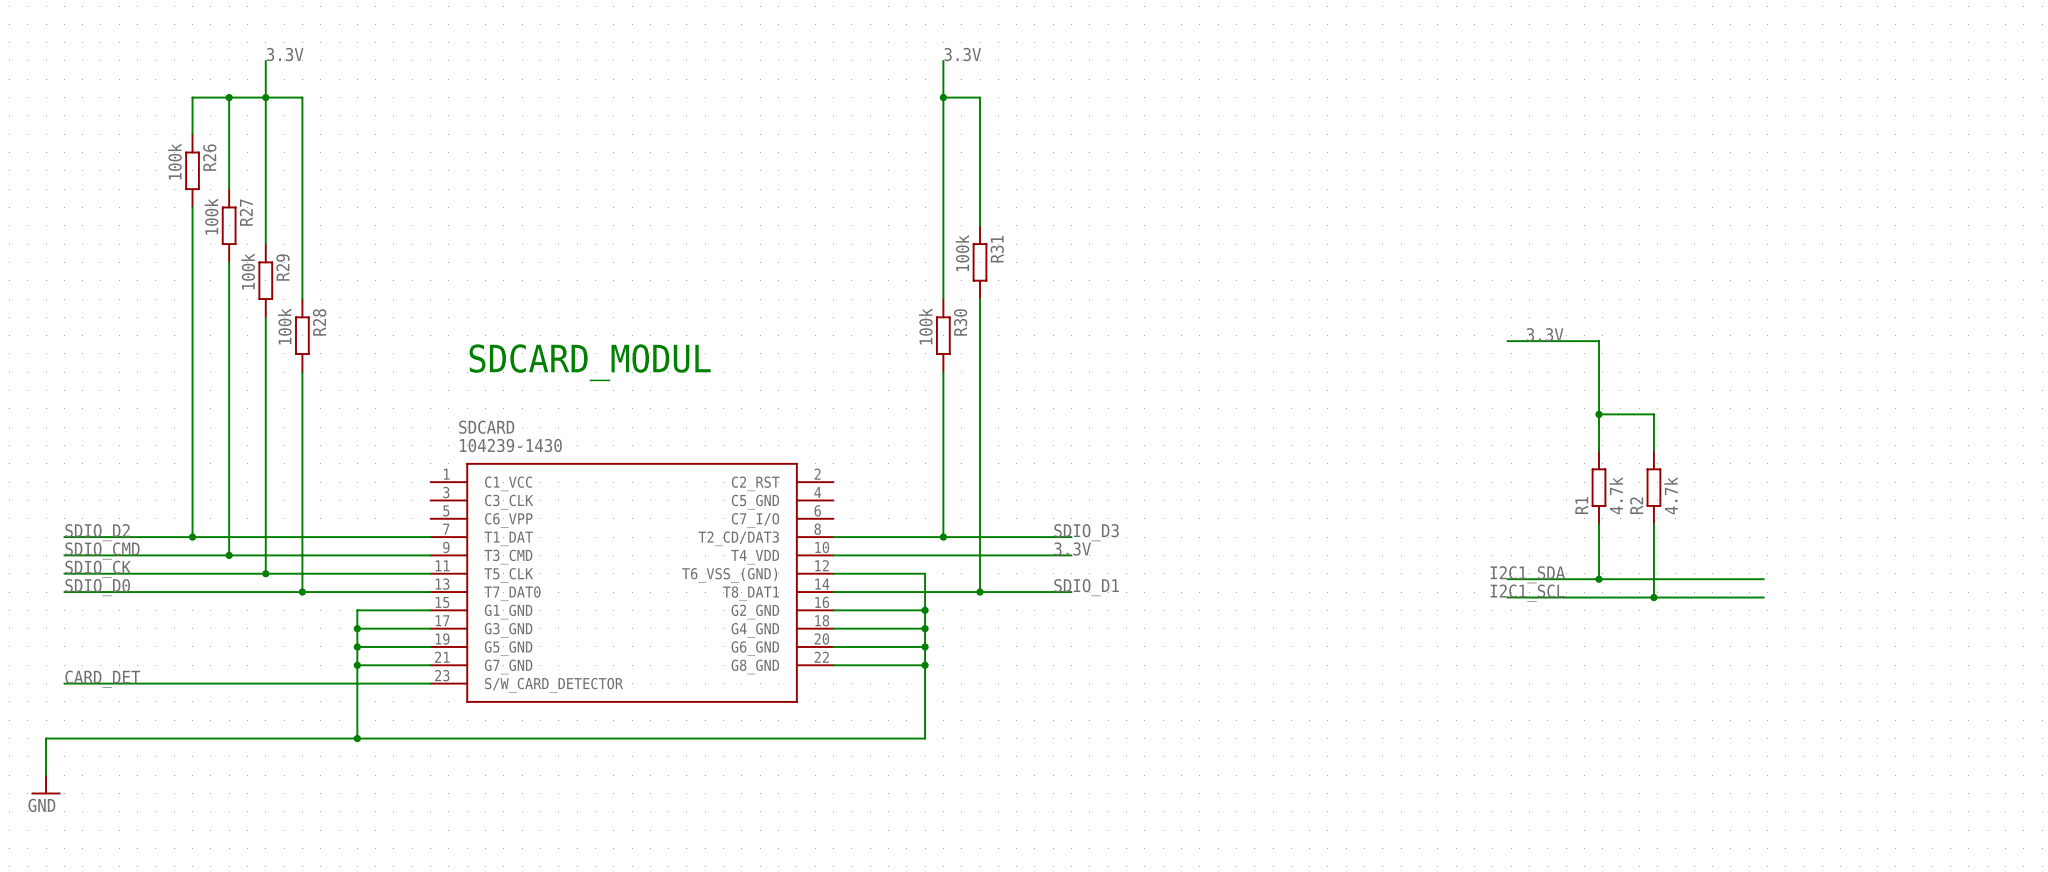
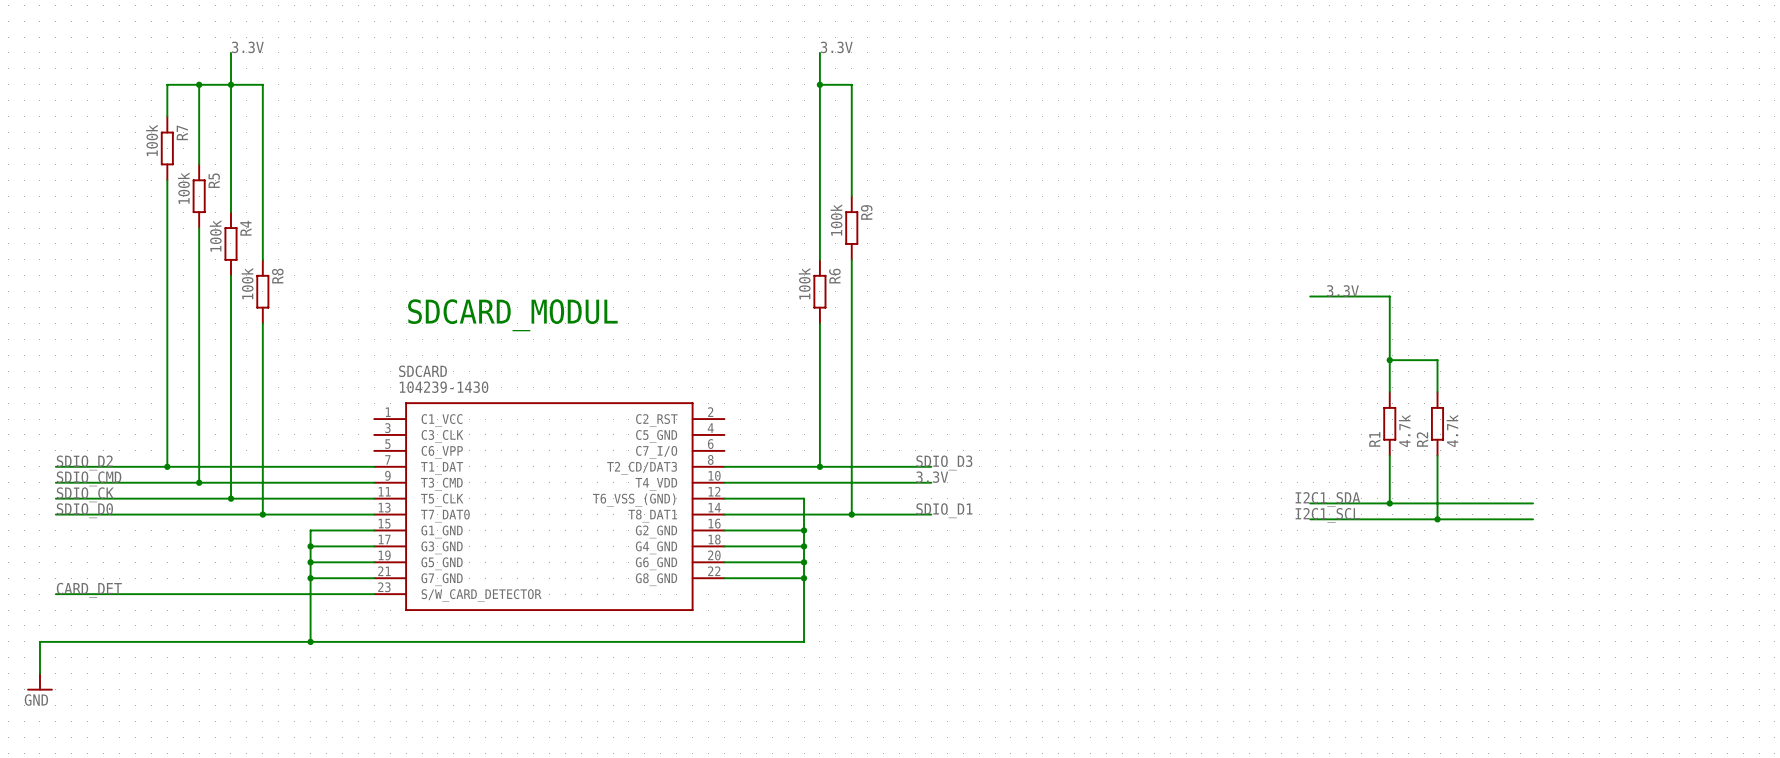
R26 name: R26 (209, 157) -> R7 (182, 132)
R27 name: R27 (246, 212) -> R5 (214, 180)
R31 name: R31 (997, 249) -> R9 (866, 212)
R29 name: R29 (283, 267) -> R4 (245, 228)
R28 name: R28 (319, 322) -> R8 (277, 276)
R30 name: R30 (960, 322) -> R6 (834, 276)

